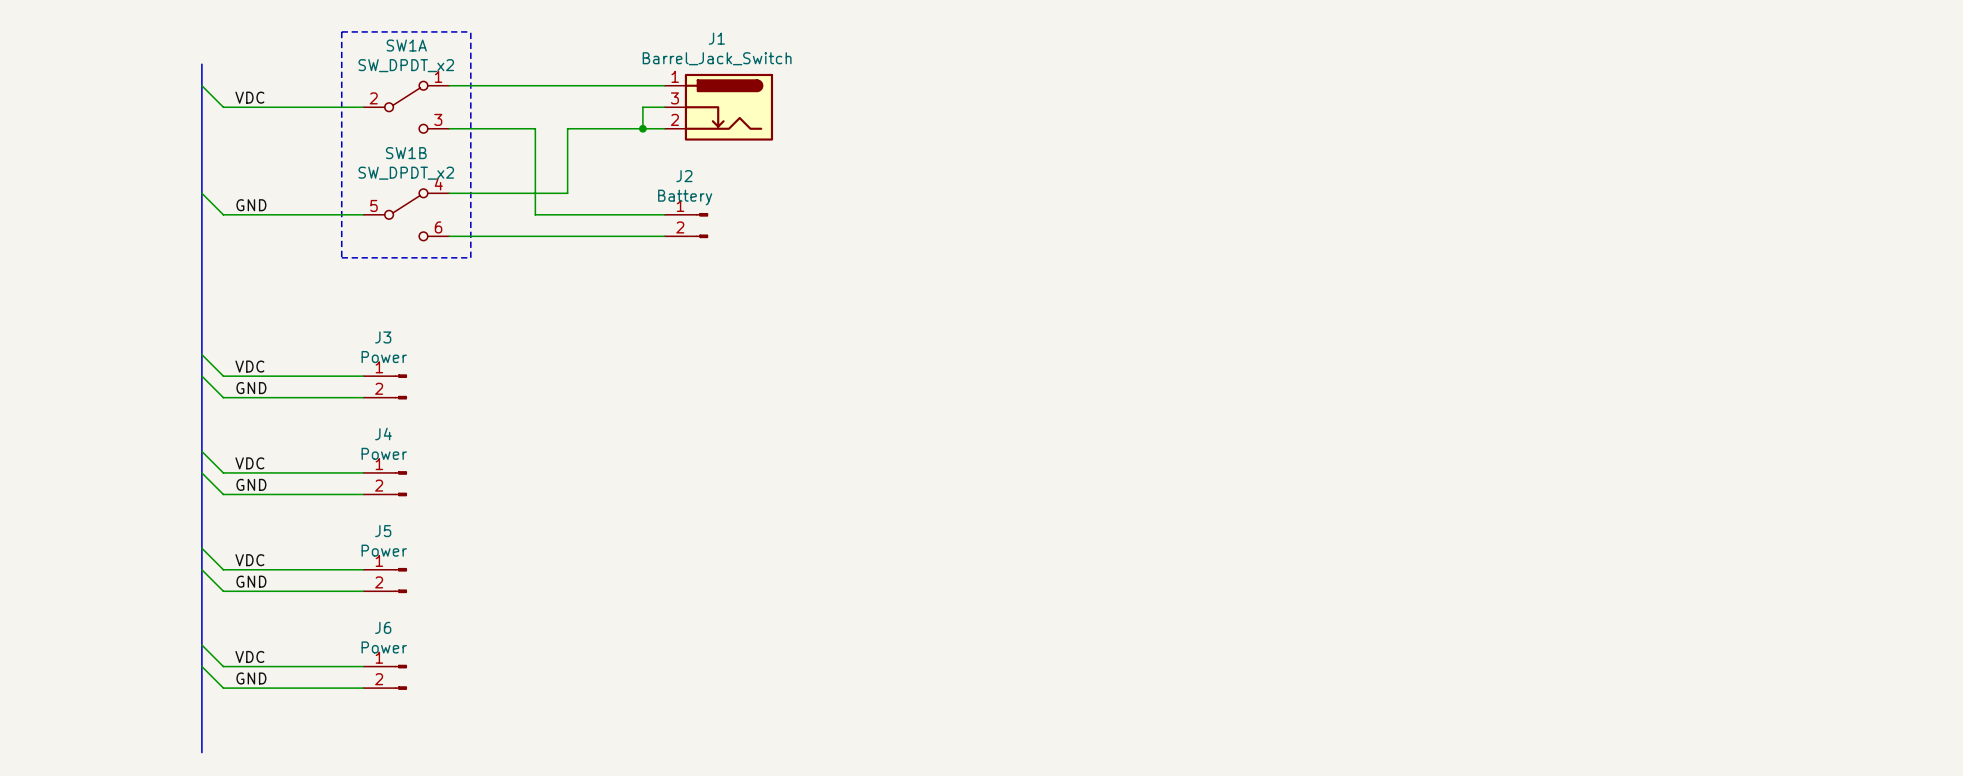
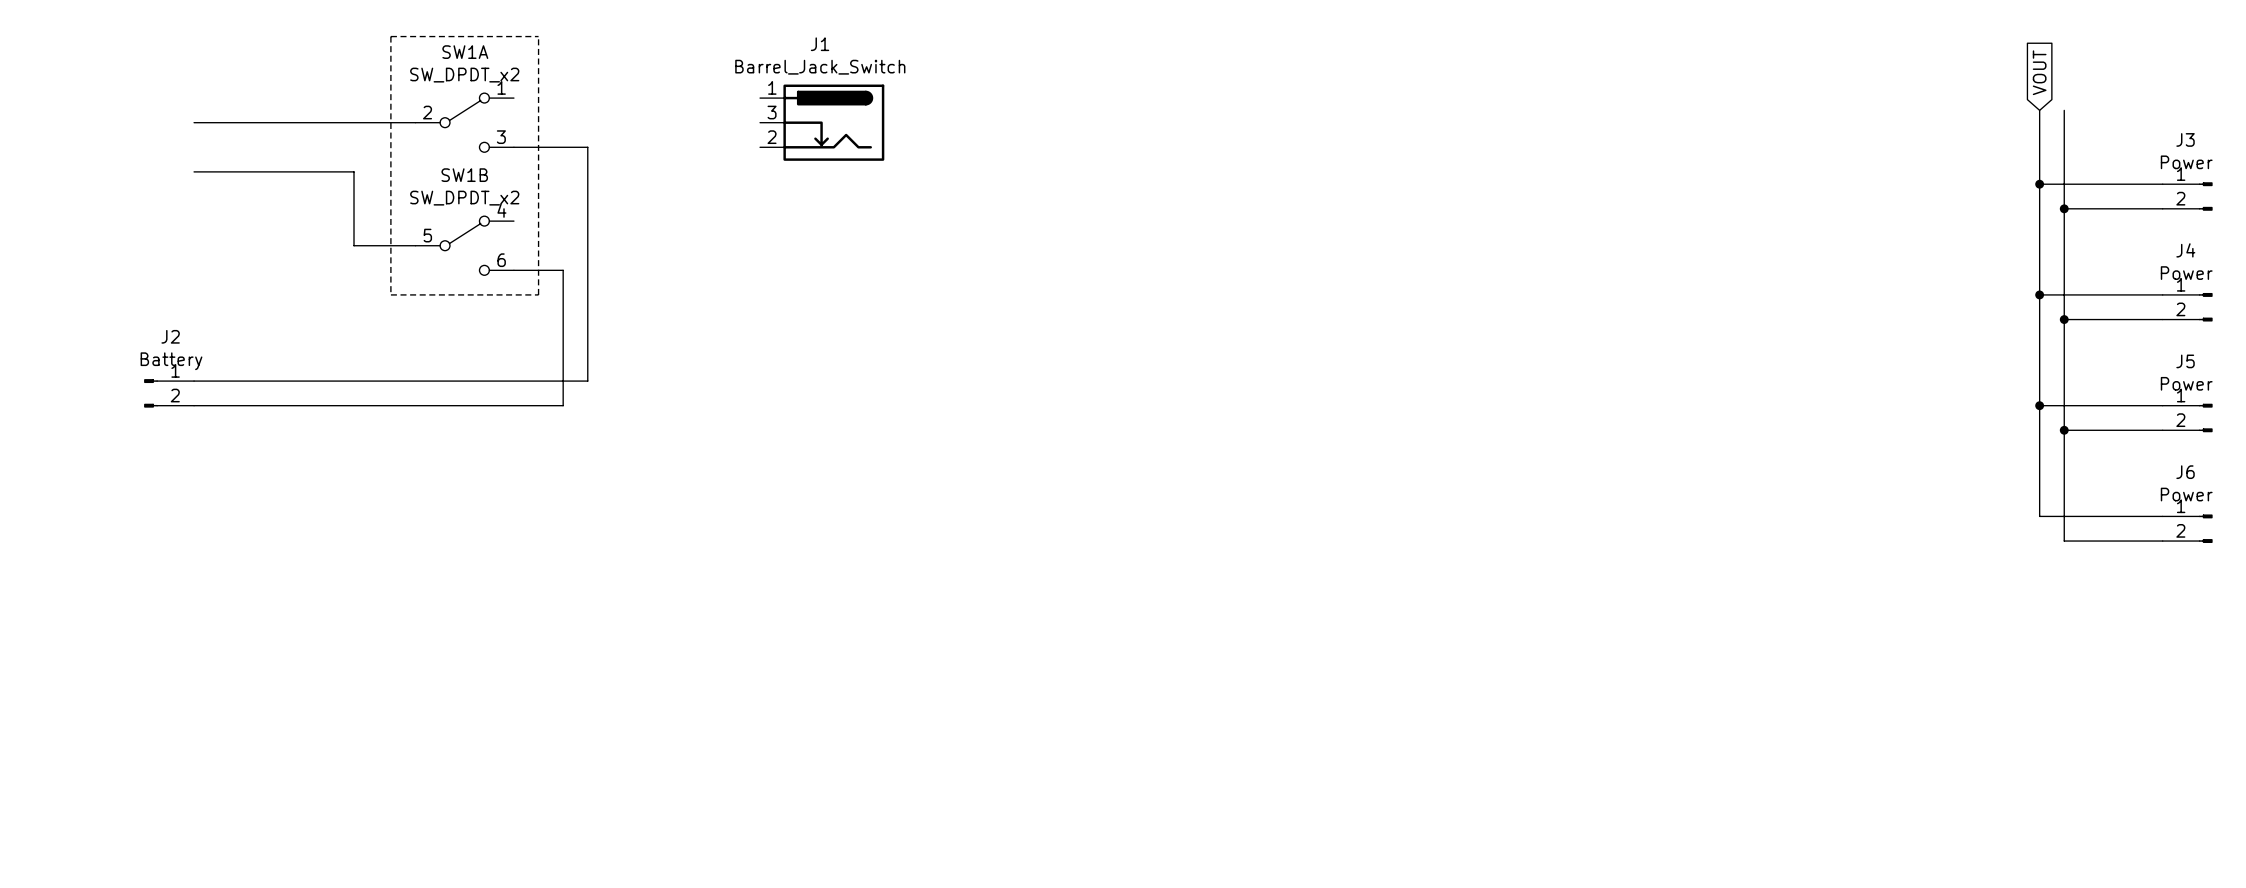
global label: none -> VOUT (2039, 72)
bus: (201, 64) (201, 752) -> none
wire: (201, 85) (223, 107) -> (194, 122) (255, 122)
wire: (449, 85) (664, 85) -> none
wire: none -> (2039, 110) (2039, 516) (2162, 516)
wire: none -> (2064, 110) (2064, 541) (2162, 541)
label: VDC (249, 97) -> none
wire: (664, 107) (642, 107) (642, 128) -> none
wire: (513, 128) (535, 128) (535, 214) (664, 214) -> (587, 147) (587, 381) (194, 381)
junction: (642, 128) -> none
wire: (664, 128) (567, 128) (567, 193) (449, 193) -> none
wire: none -> (2039, 184) (2162, 184)
junction: none -> (2039, 184)
wire: none -> (2064, 208) (2162, 208)
junction: none -> (2064, 208)
wire: (201, 193) (223, 214) (309, 214) -> (194, 171) (354, 171) (354, 245)
label: GND (251, 205) -> none
J2 position: (686, 225) -> (169, 393)
J2 flip: as is (702, 225) -> left-right (150, 393)
wire: (492, 236) (664, 236) -> (563, 270) (563, 405) (194, 405)
wire: none -> (2039, 294) (2162, 294)
junction: none -> (2039, 294)
wire: none -> (2064, 319) (2162, 319)
junction: none -> (2064, 319)
wire: (201, 354) (223, 376) (363, 376) -> none
wire: none -> (2039, 405) (2162, 405)
junction: none -> (2039, 405)
label: VDC (249, 366) -> none
wire: (201, 376) (223, 397) (363, 397) -> none
wire: none -> (2064, 430) (2162, 430)
junction: none -> (2064, 430)
J3 position: (385, 386) -> (2187, 196)
label: GND (251, 388) -> none
wire: (201, 451) (223, 472) (363, 472) -> none
label: VDC (249, 463) -> none
wire: (201, 472) (223, 494) (363, 494) -> none
J4 position: (385, 483) -> (2187, 307)
label: GND (251, 484) -> none
wire: (201, 548) (223, 569) (363, 569) -> none
label: VDC (249, 560) -> none
wire: (201, 569) (223, 591) (363, 591) -> none
J5 position: (385, 580) -> (2187, 417)
label: GND (251, 581) -> none
wire: (201, 645) (223, 666) (363, 666) -> none
label: VDC (249, 656) -> none
wire: (201, 666) (223, 688) (363, 688) -> none
J6 position: (385, 677) -> (2187, 528)
label: GND (251, 678) -> none

